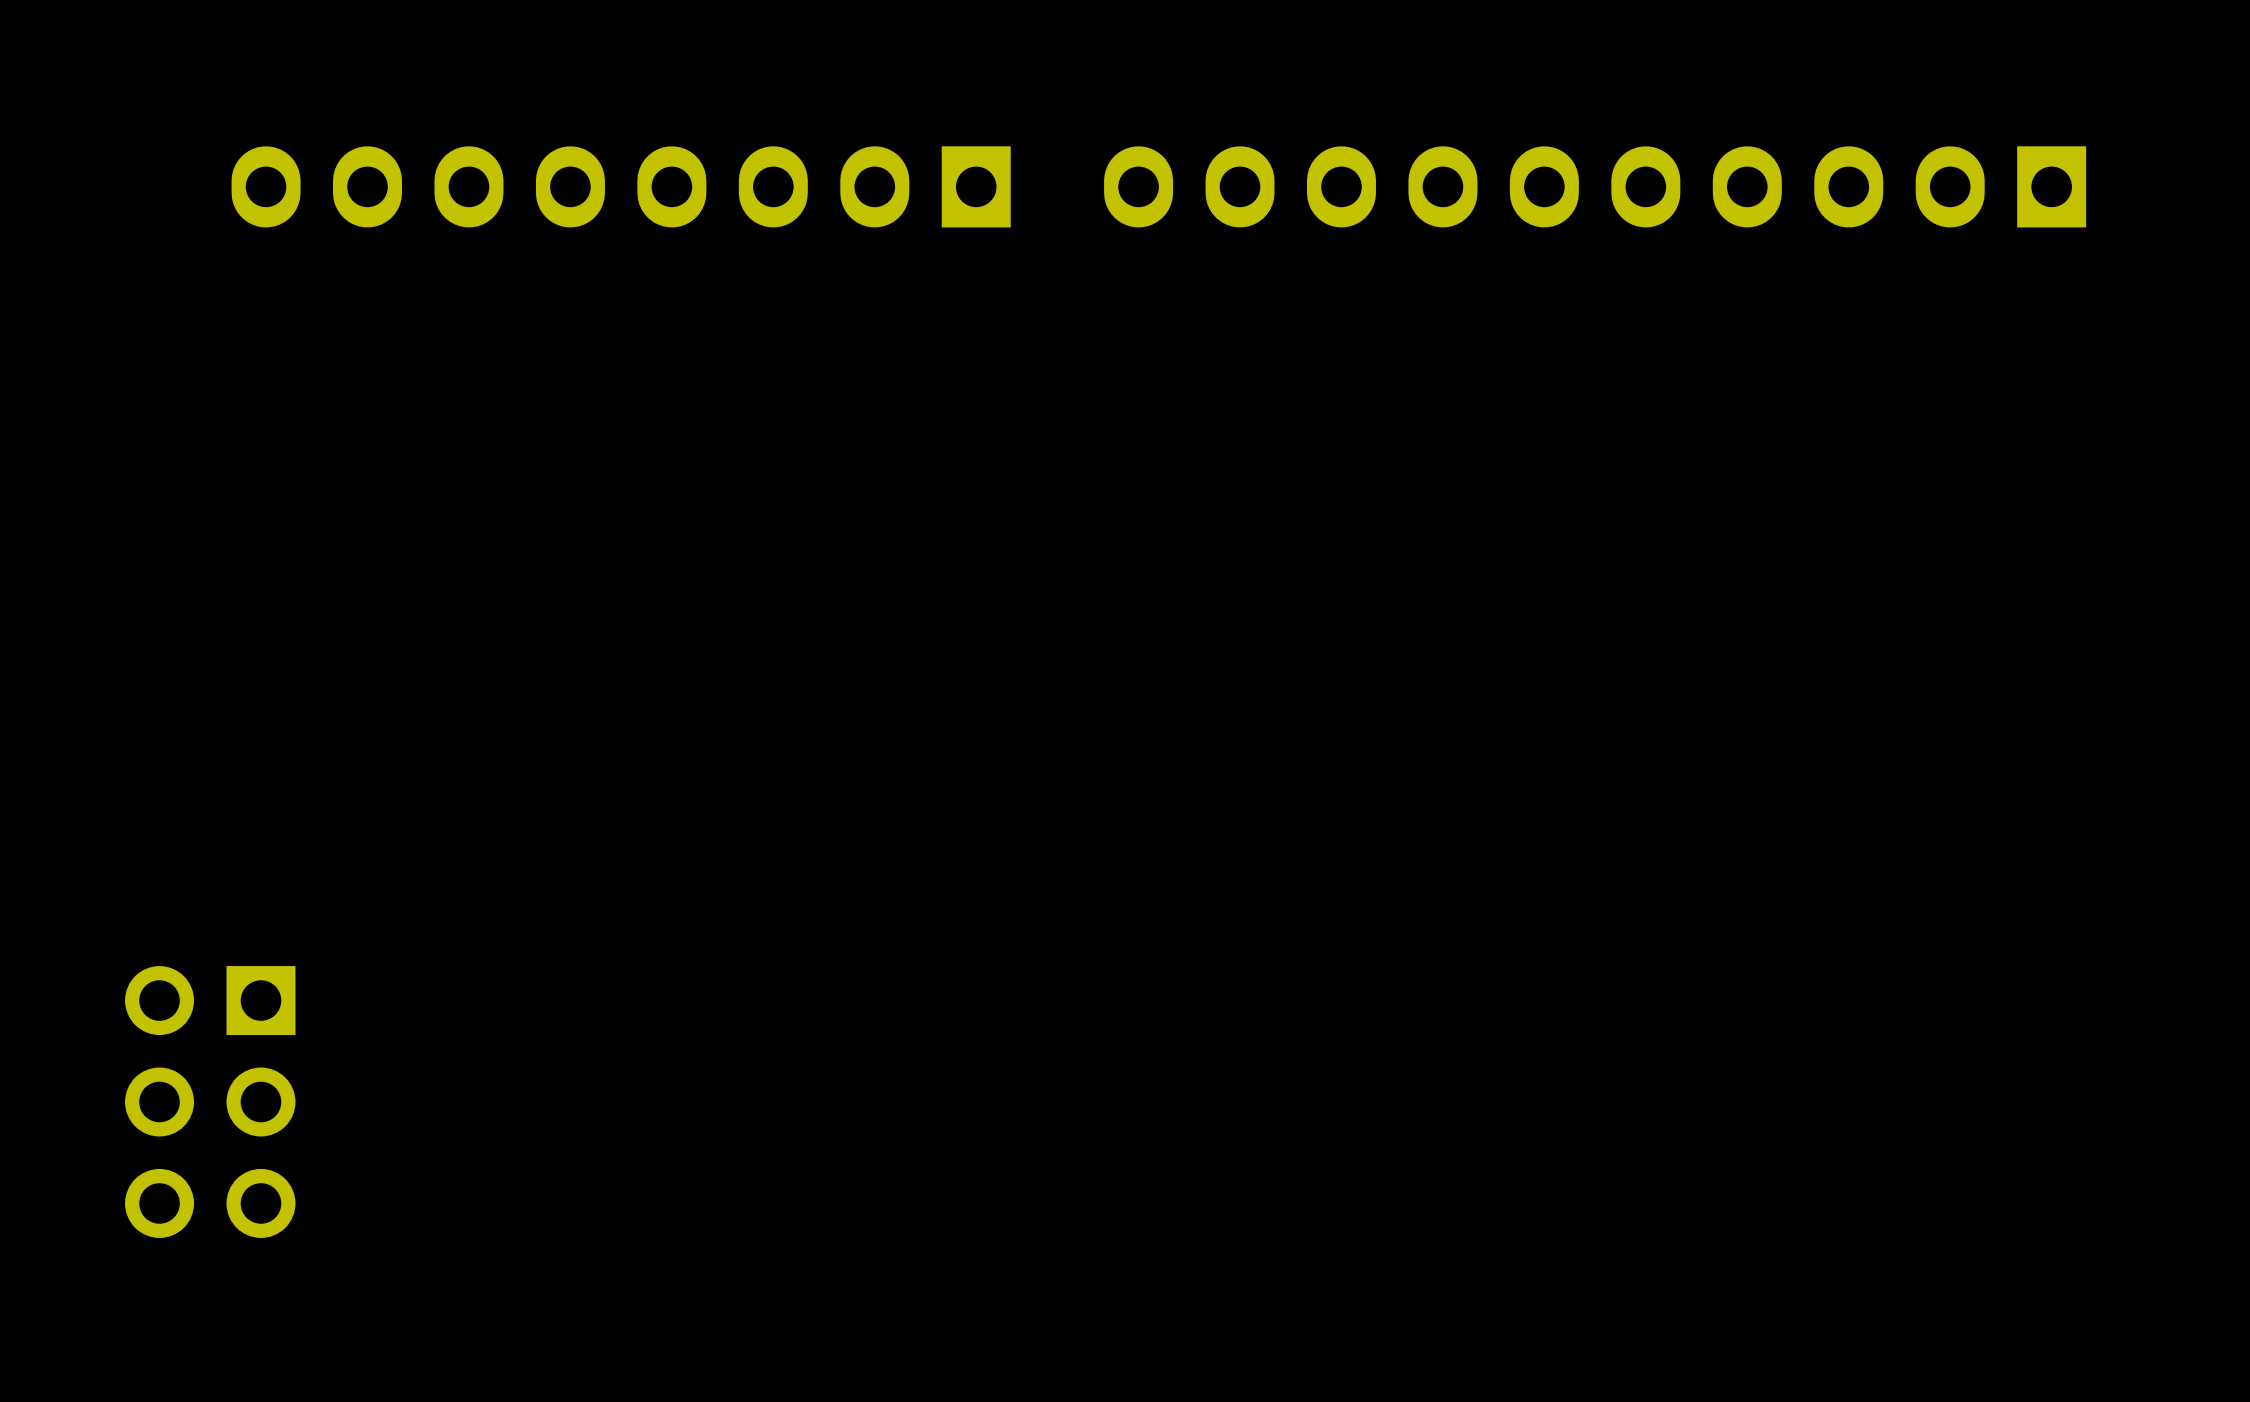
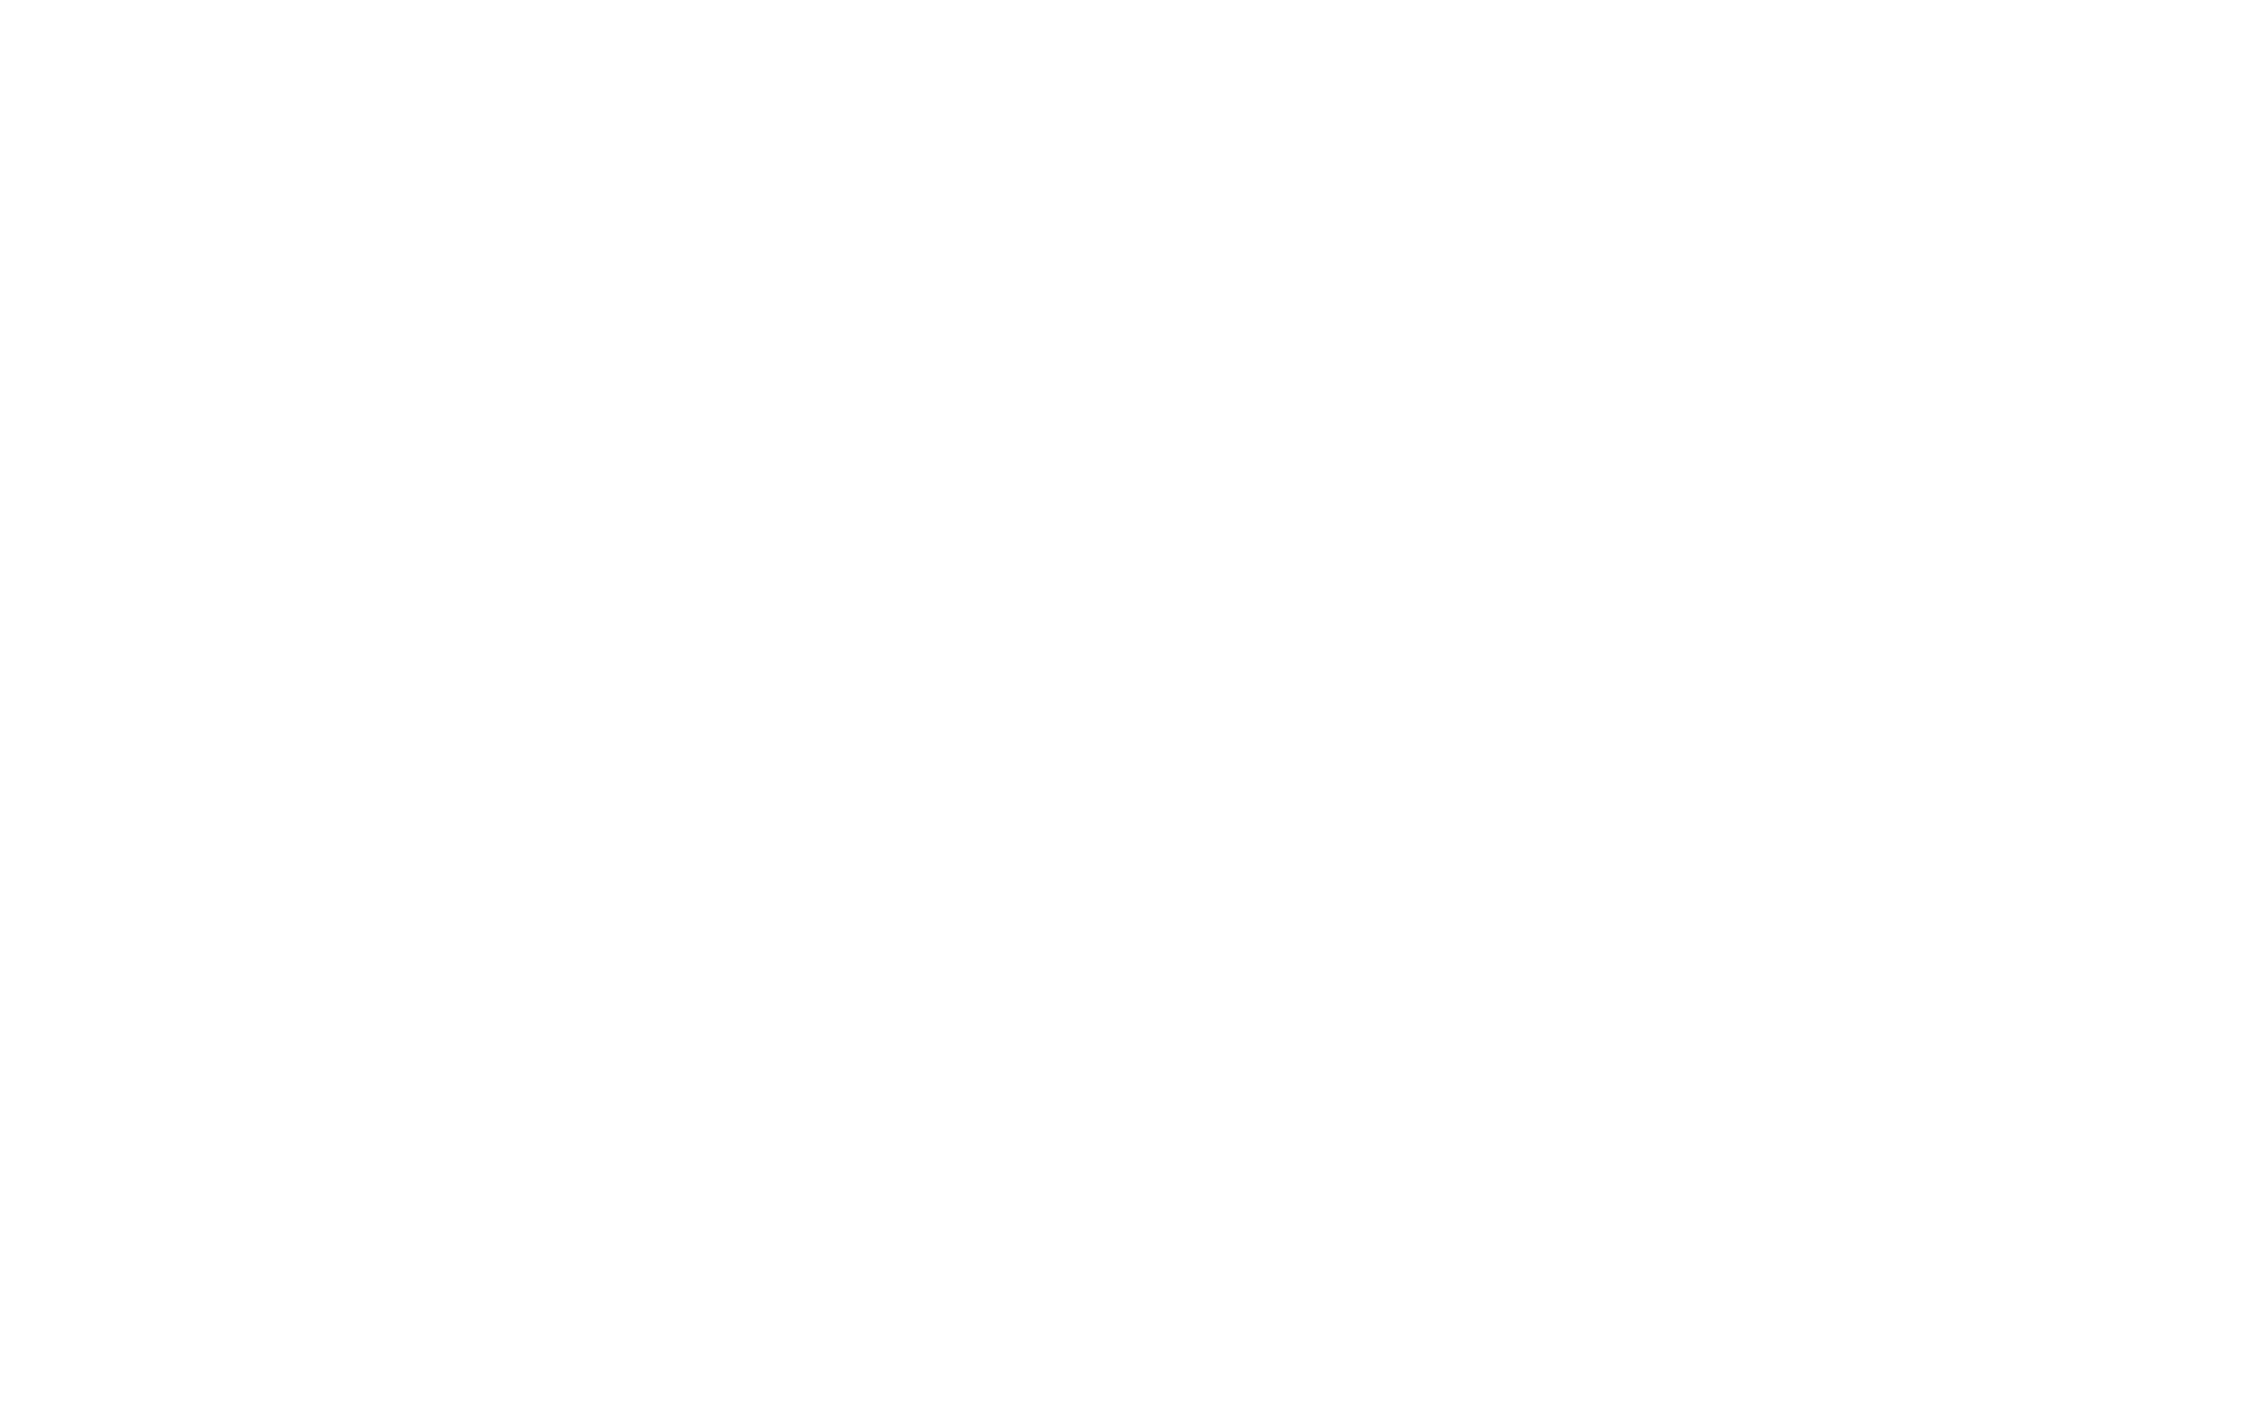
part: (621, 186) -> none
part: (1595, 186) -> none
part: (210, 1102) -> none

